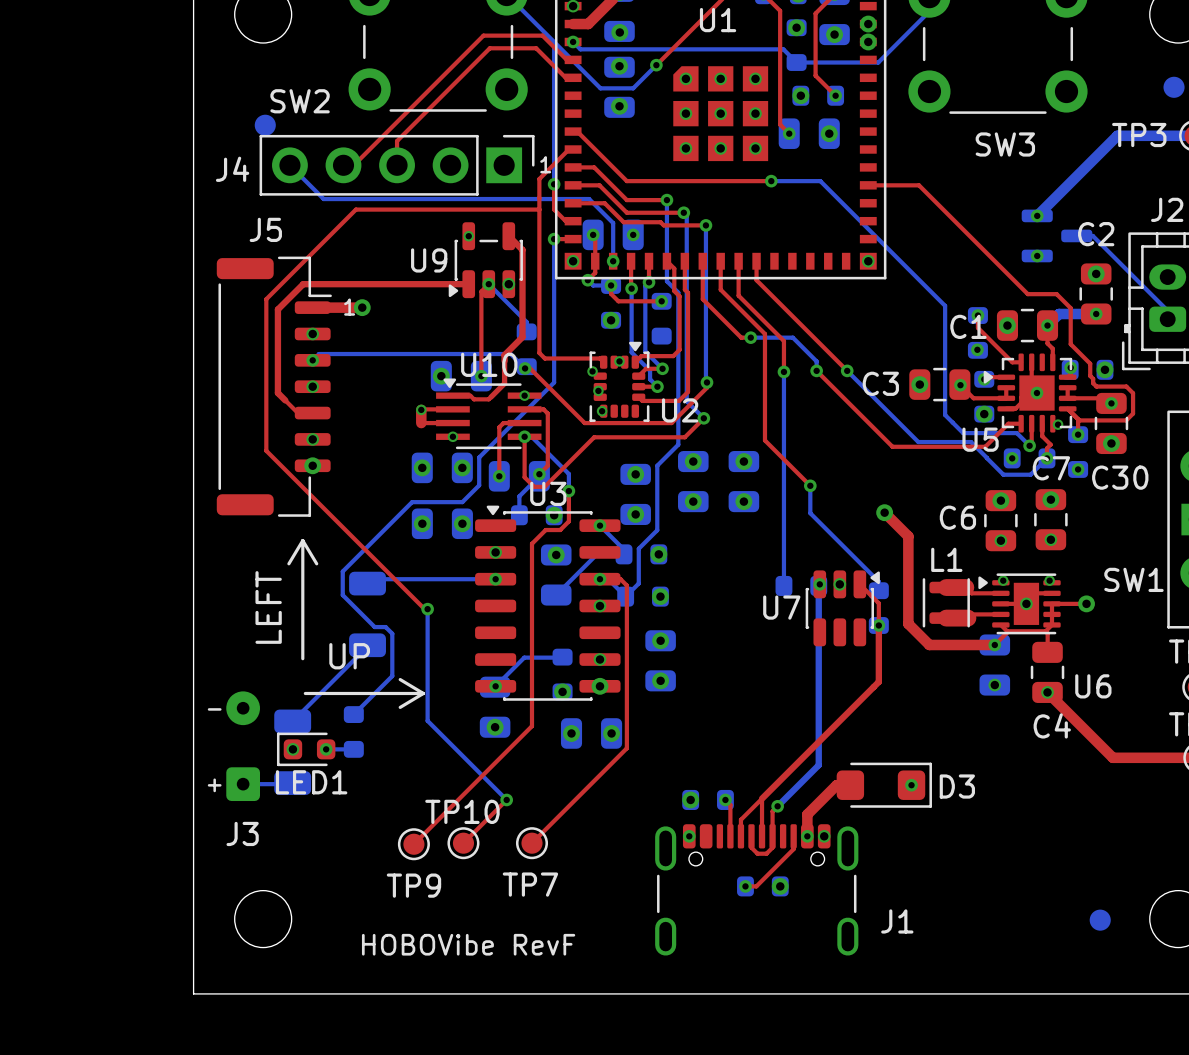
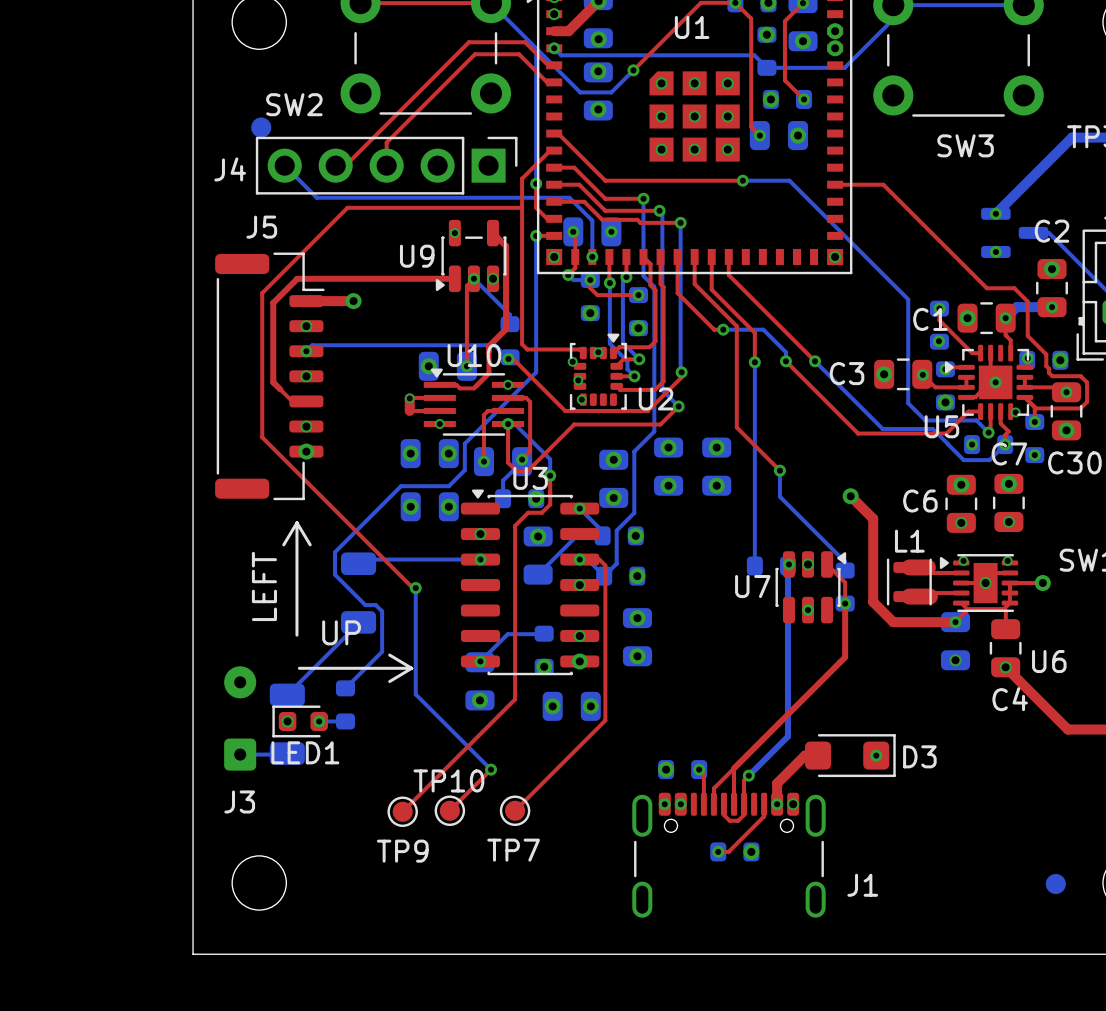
text: 1 (545, 164) -> none
text: 1 (349, 307) -> none
via: none -> (638, 328)
via: none -> (808, 610)
text: - (214, 709) -> none
text: + (214, 785) -> none
via: none -> (680, 804)
text: HOBOVibe RevF (468, 944) -> none

